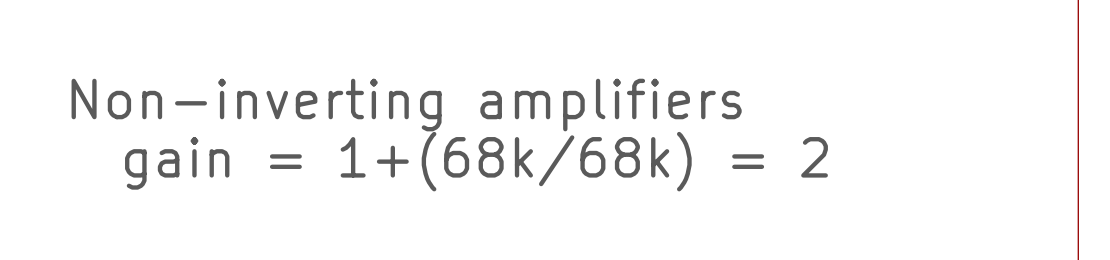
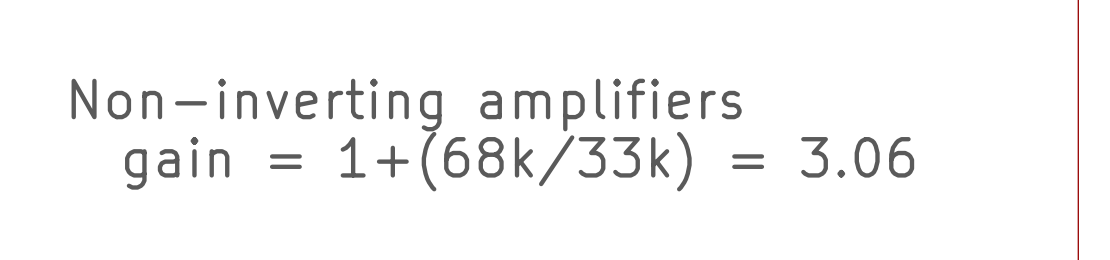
text: gain = 1+(68k/68k) = 2 (476, 161) -> gain = 1+(68k/33k) = 3.06 (519, 161)

